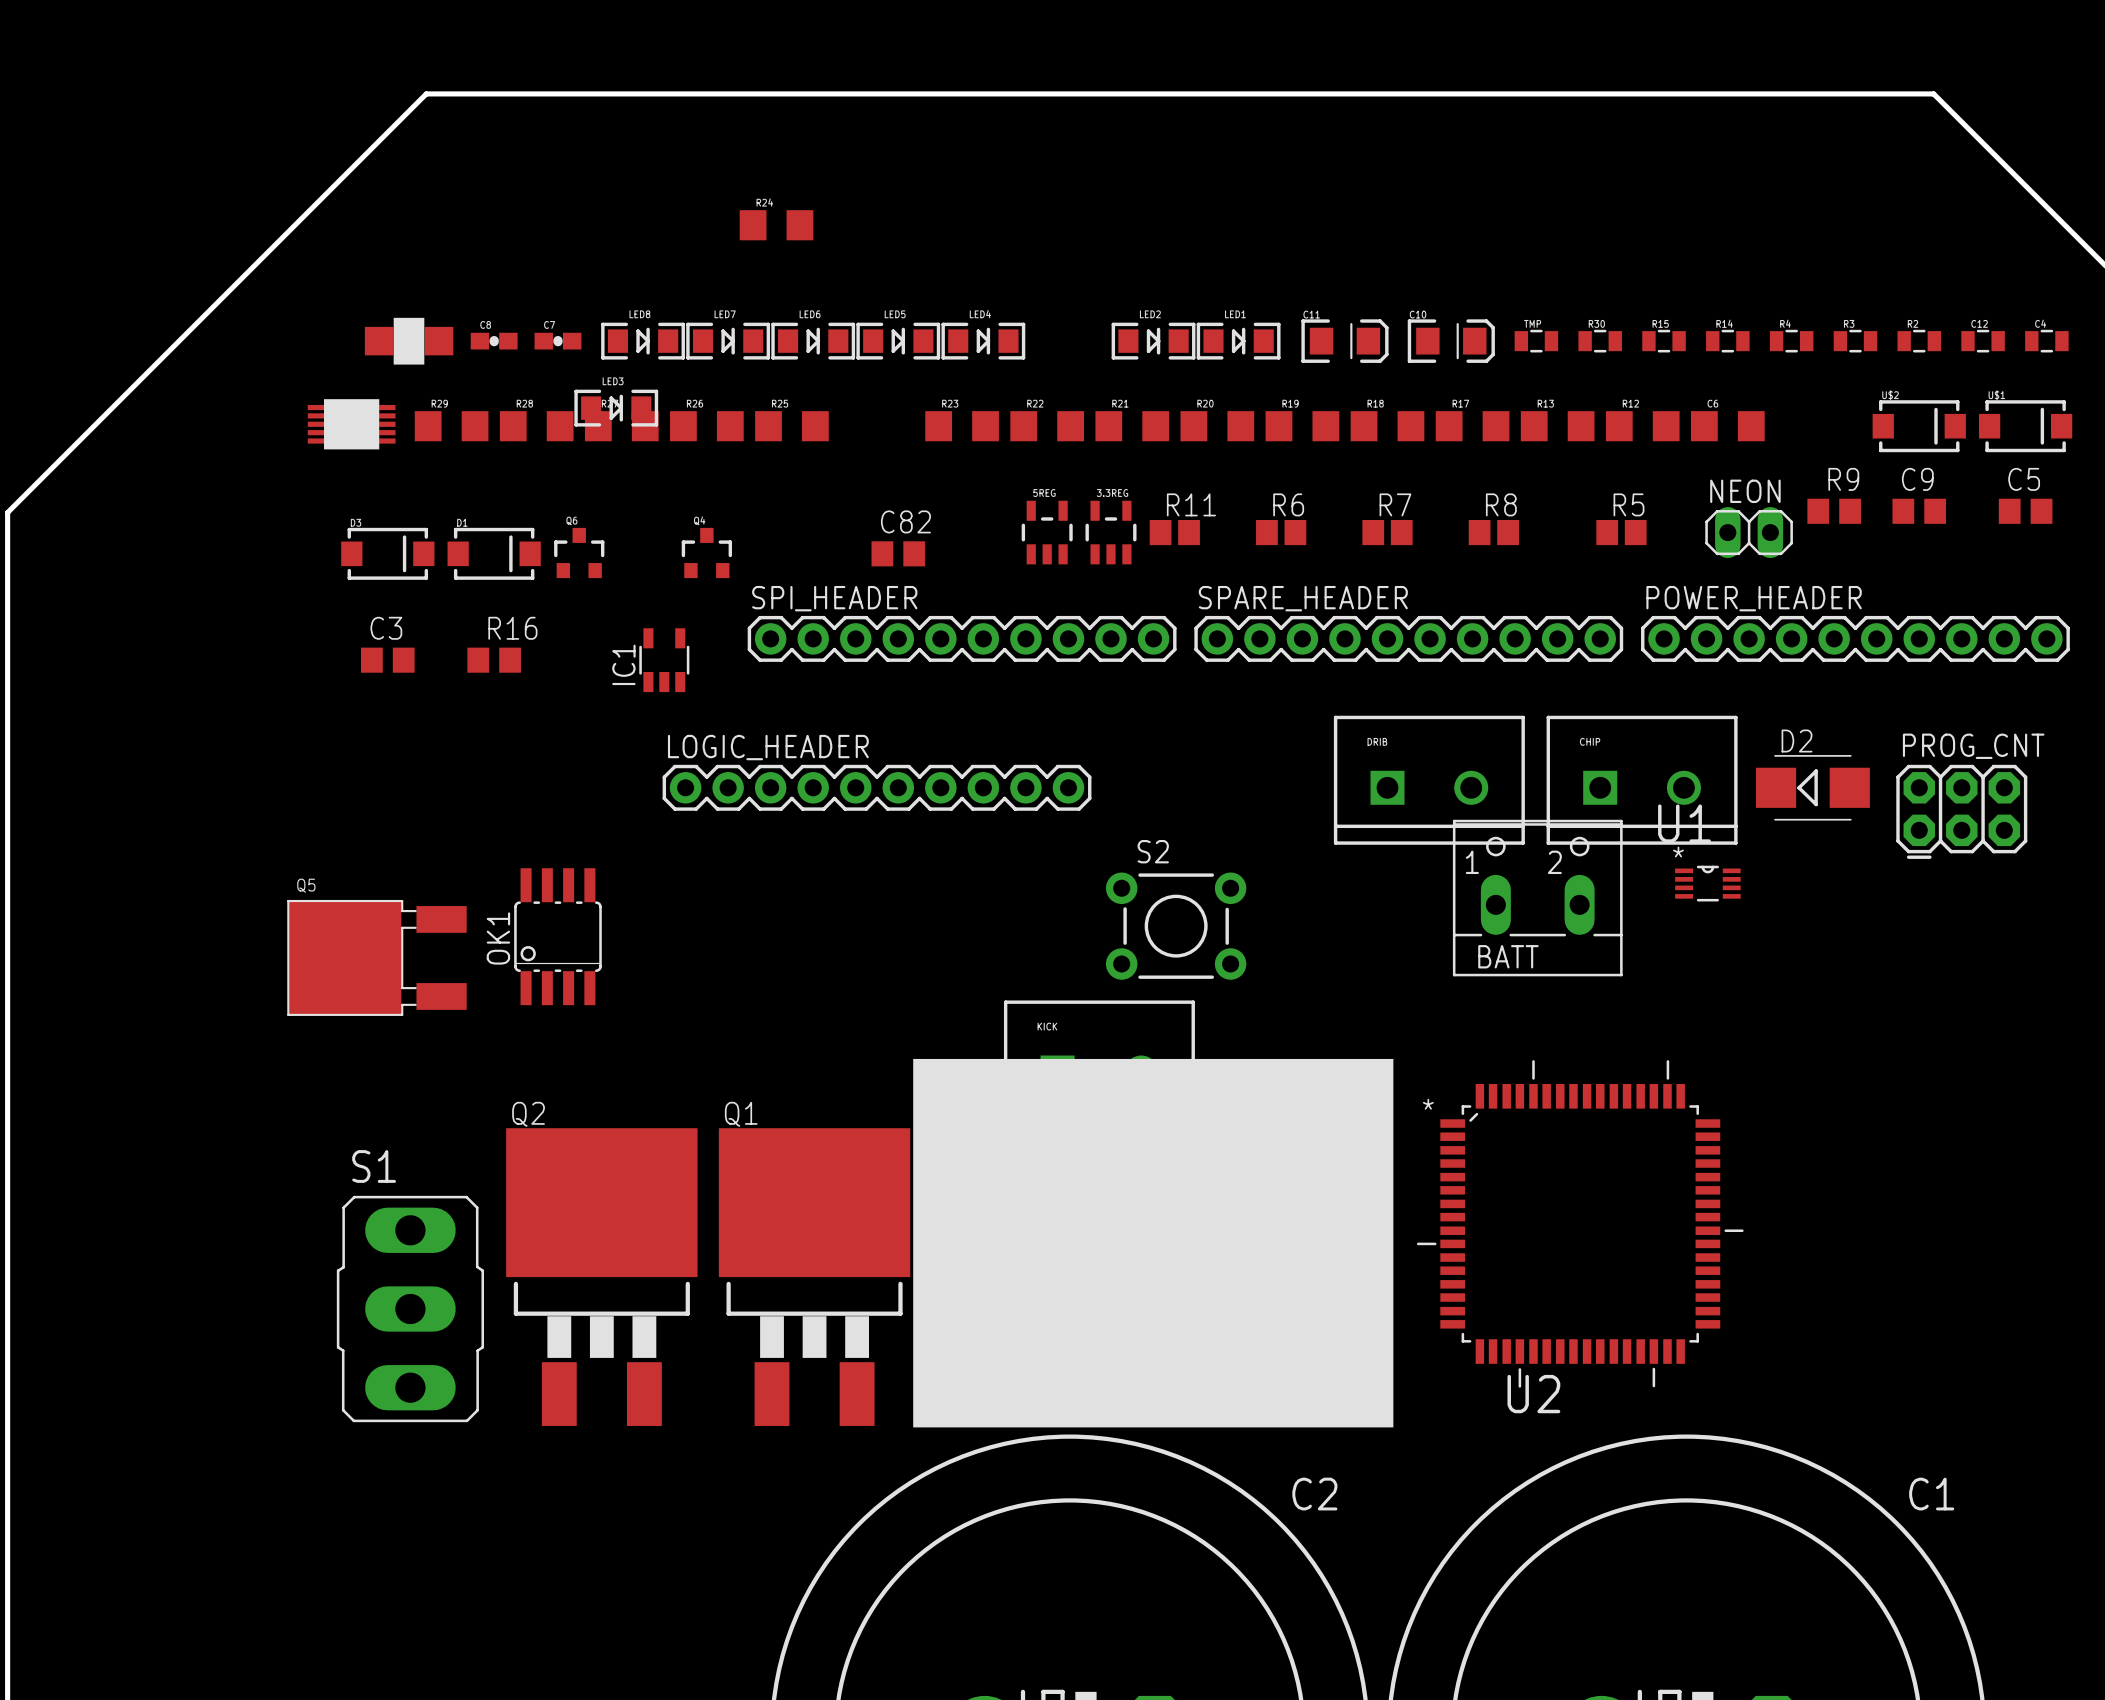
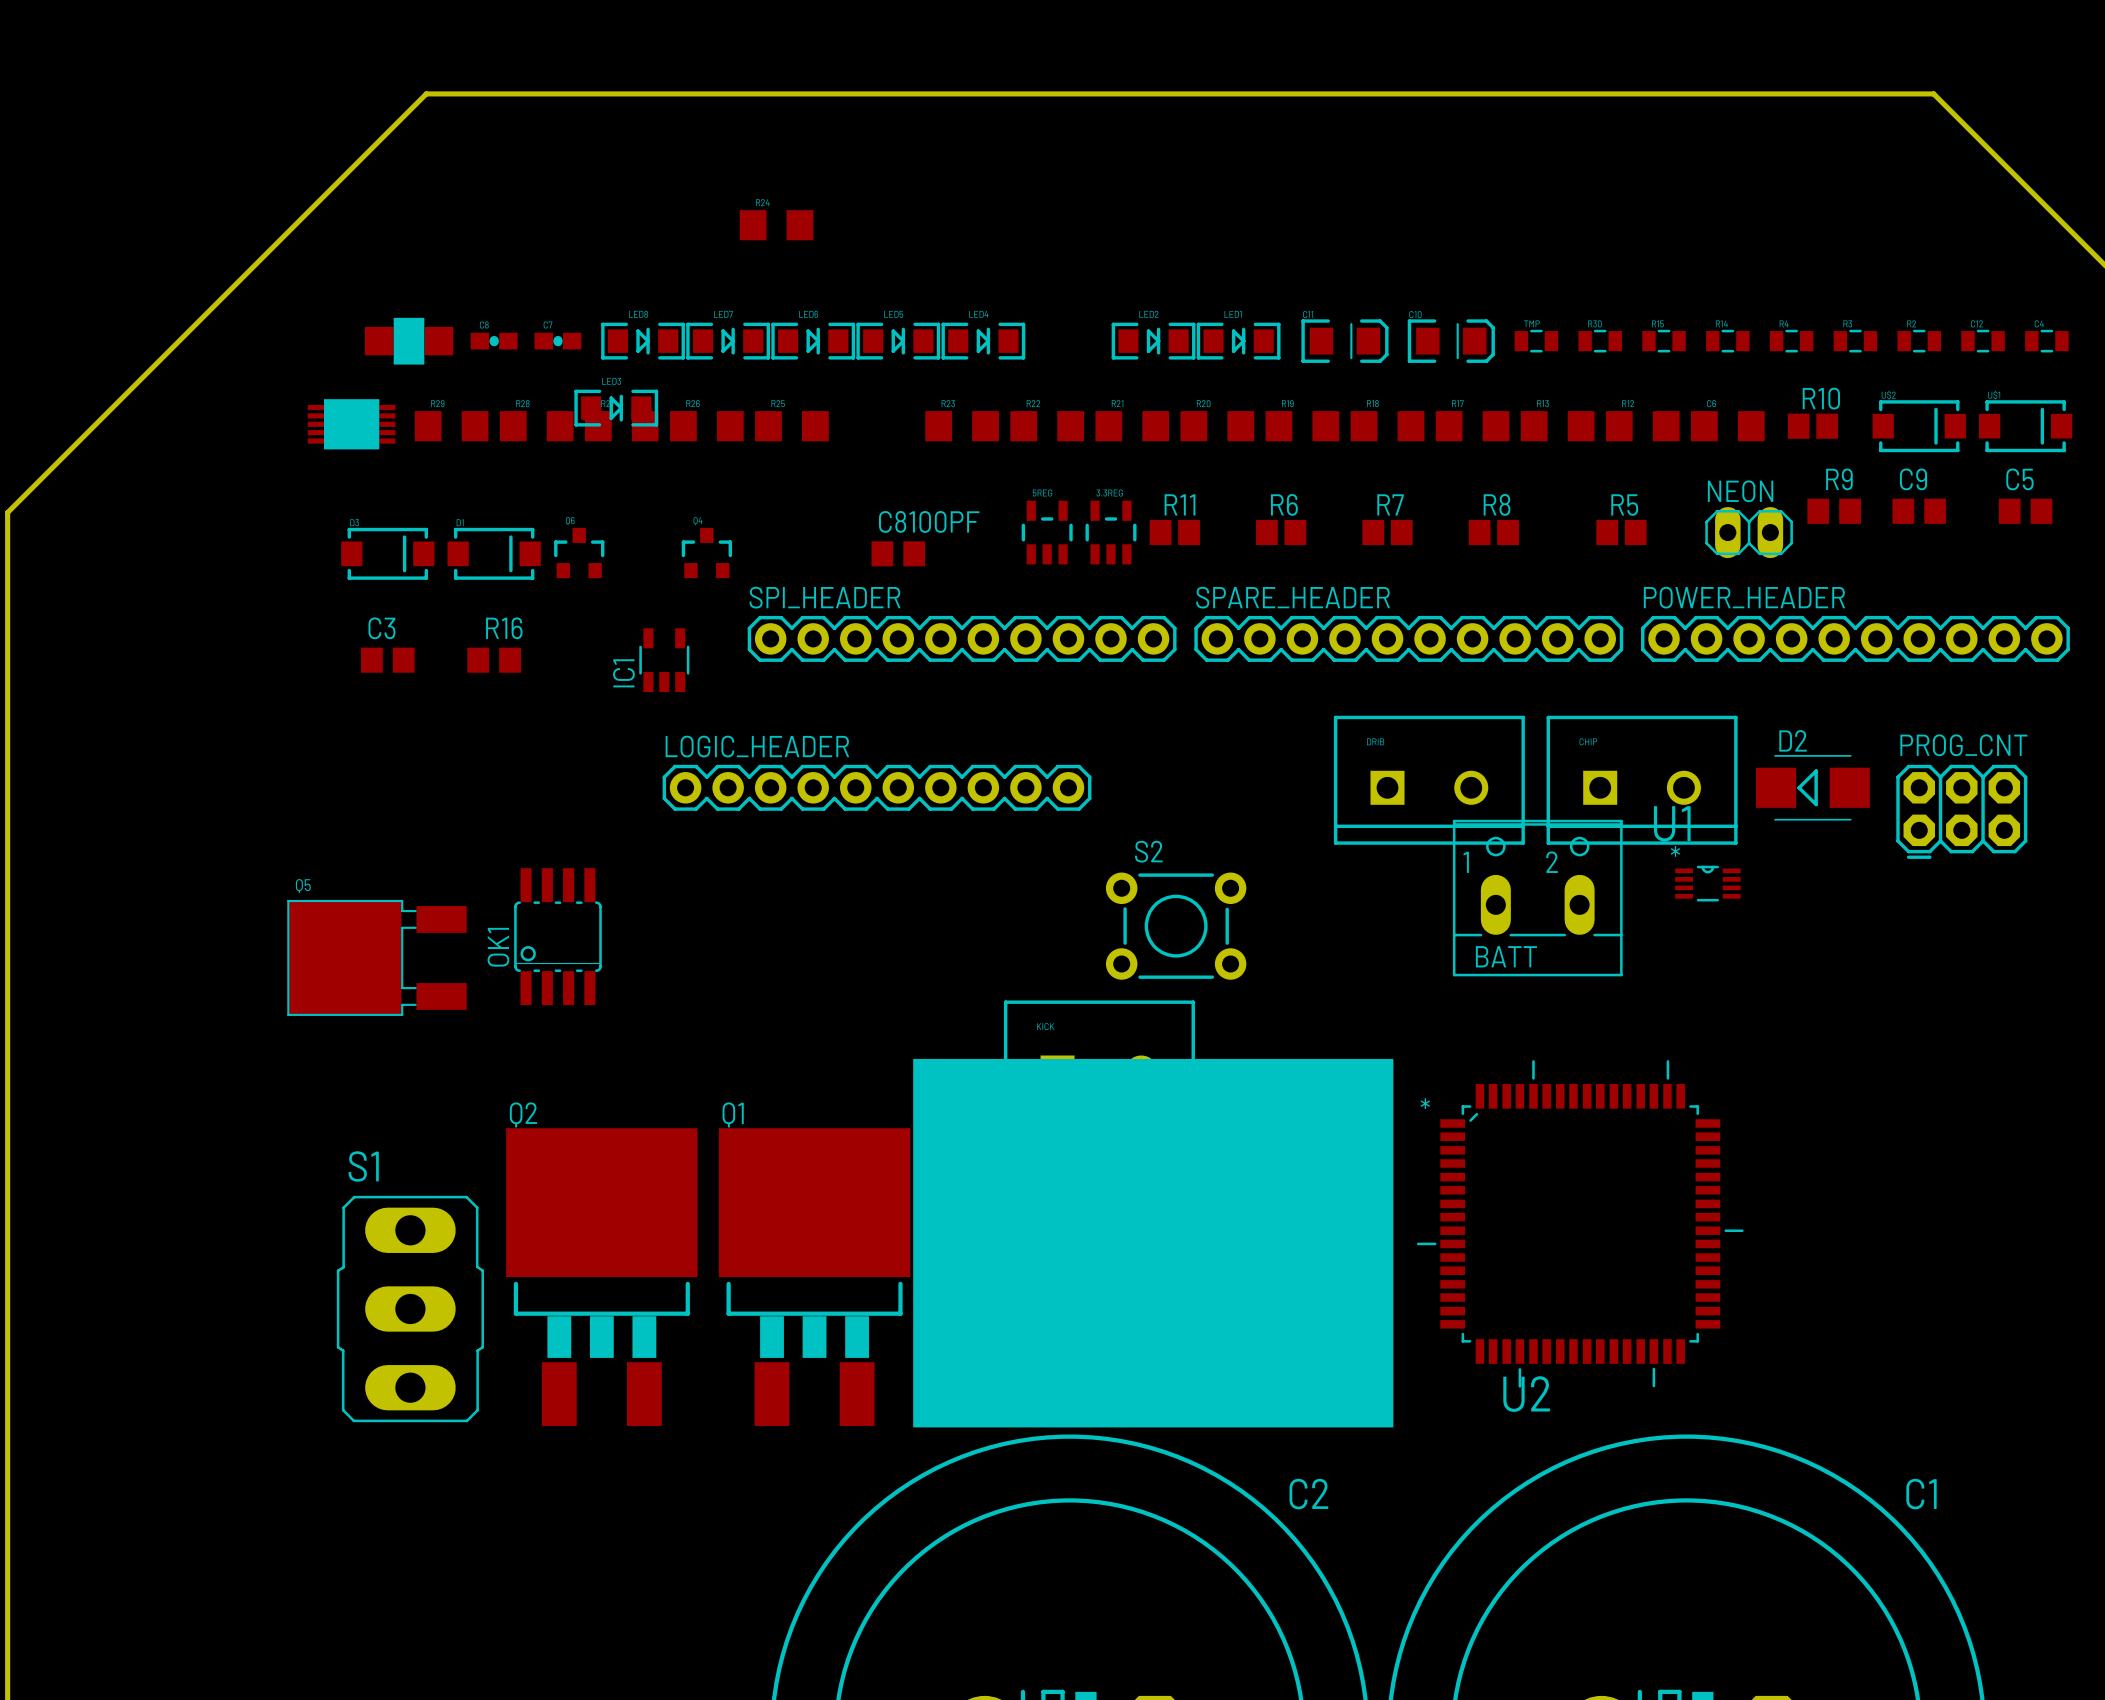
R10: none -> (1812, 426)
C82 name: C82 (905, 521) -> C8100PF (929, 521)

